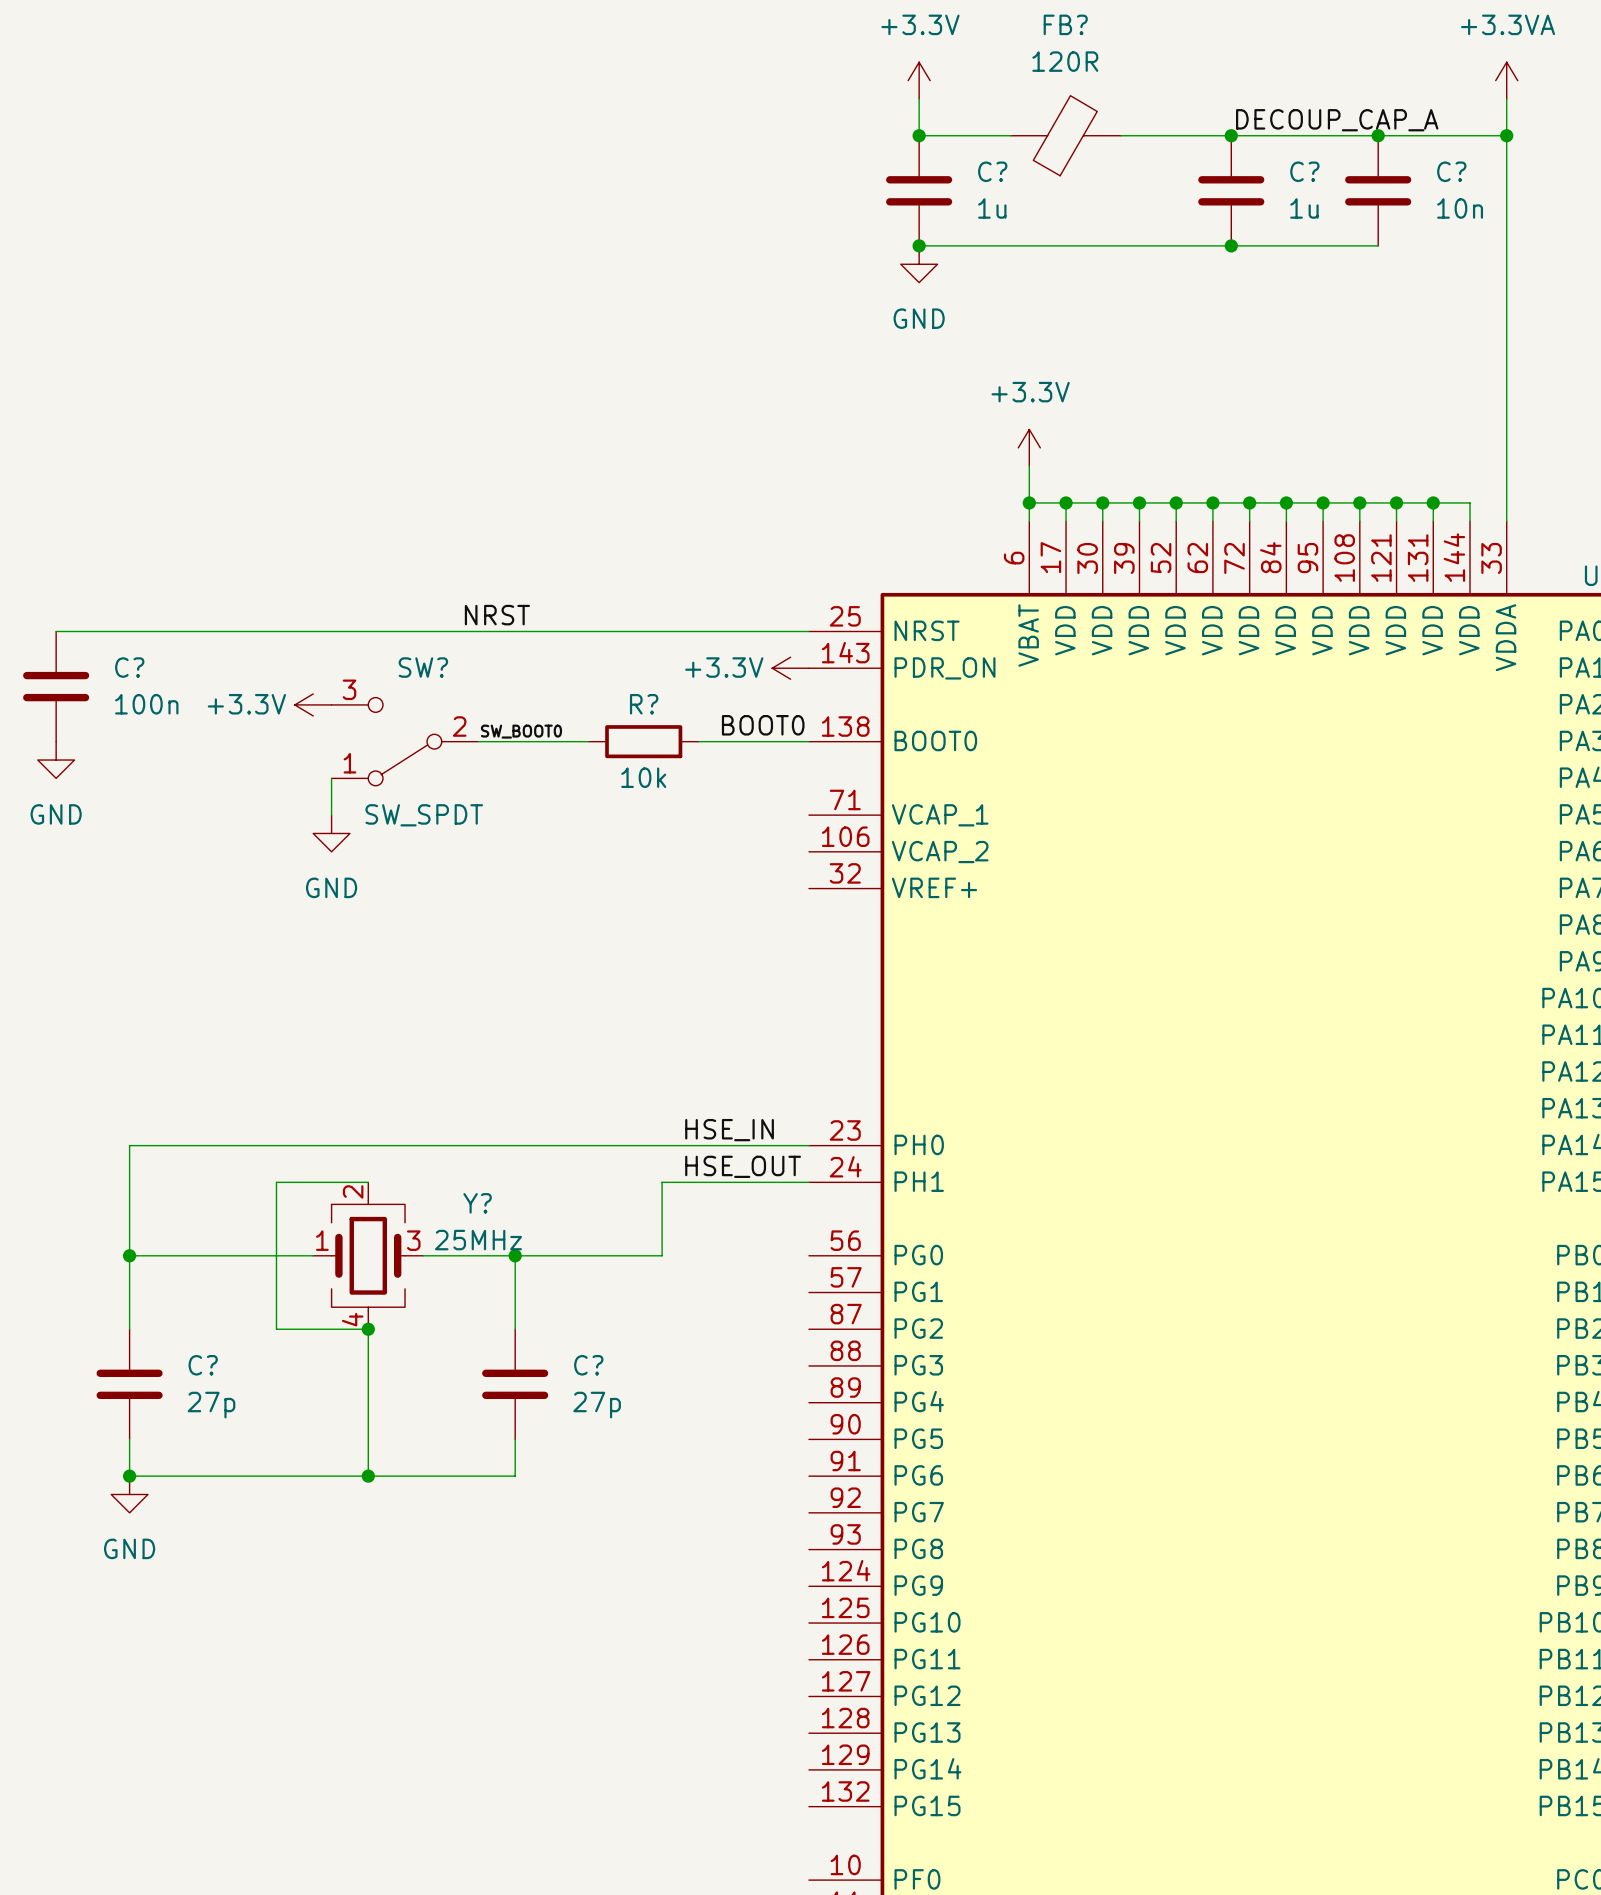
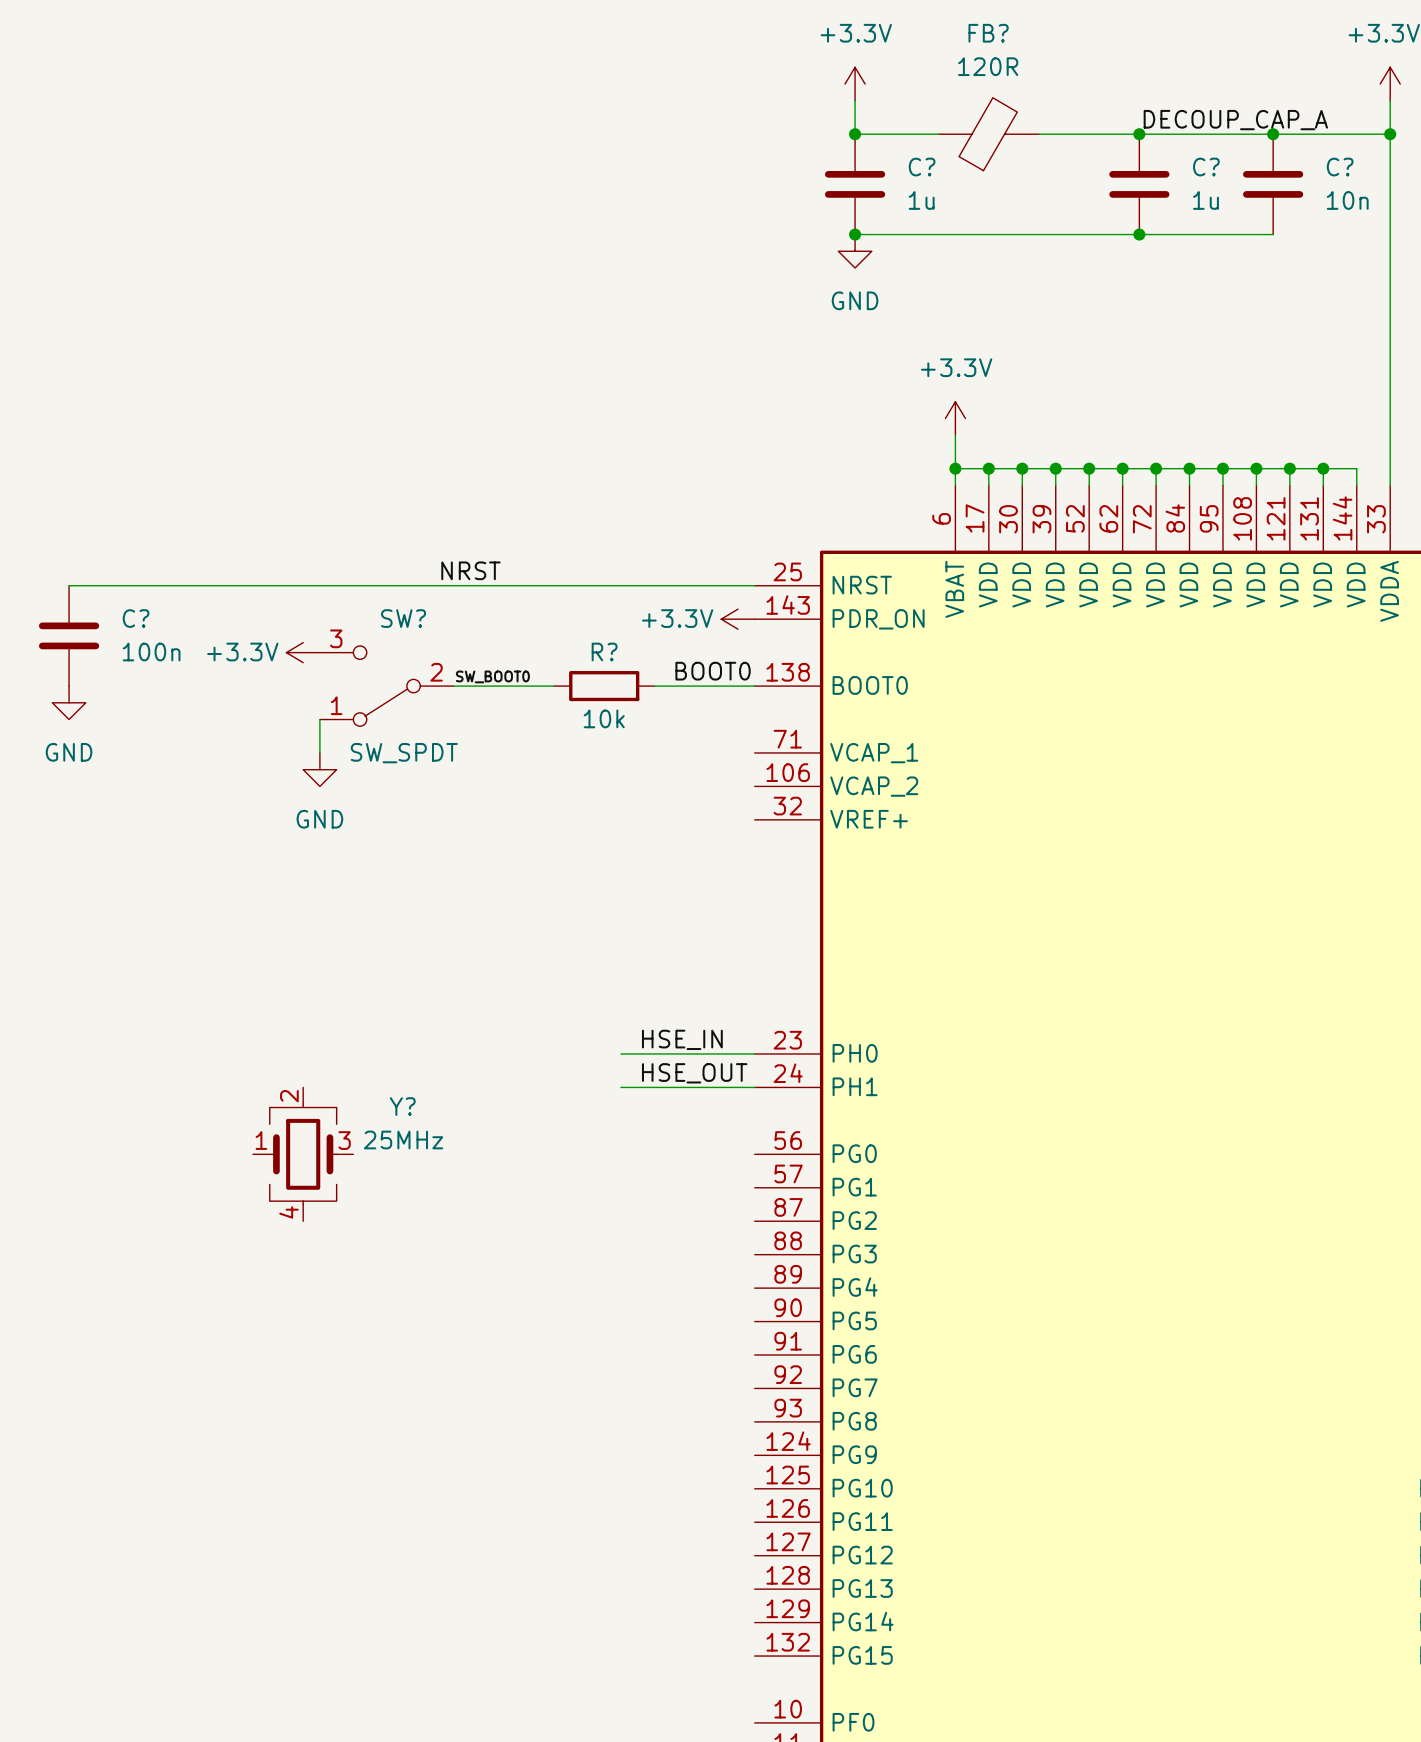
wire: (662, 1145) (129, 1145) (129, 1329) -> none
wire: (368, 1182) (276, 1182) (276, 1329) (368, 1329) (368, 1476) -> none
wire: (662, 1182) (662, 1255) (423, 1255) -> none
wire: (129, 1255) (313, 1255) -> none
junction: (129, 1255) -> none
Y? position: (368, 1255) -> (303, 1154)
wire: (515, 1255) (515, 1329) -> none
junction: (515, 1255) -> none
junction: (368, 1329) -> none
C?: 27p (129, 1384) -> none
C?: 27p (515, 1384) -> none
wire: (129, 1439) (129, 1476) (515, 1476) (515, 1439) -> none
junction: (129, 1476) -> none
junction: (368, 1476) -> none
power symbol: GND (129, 1494) -> none

